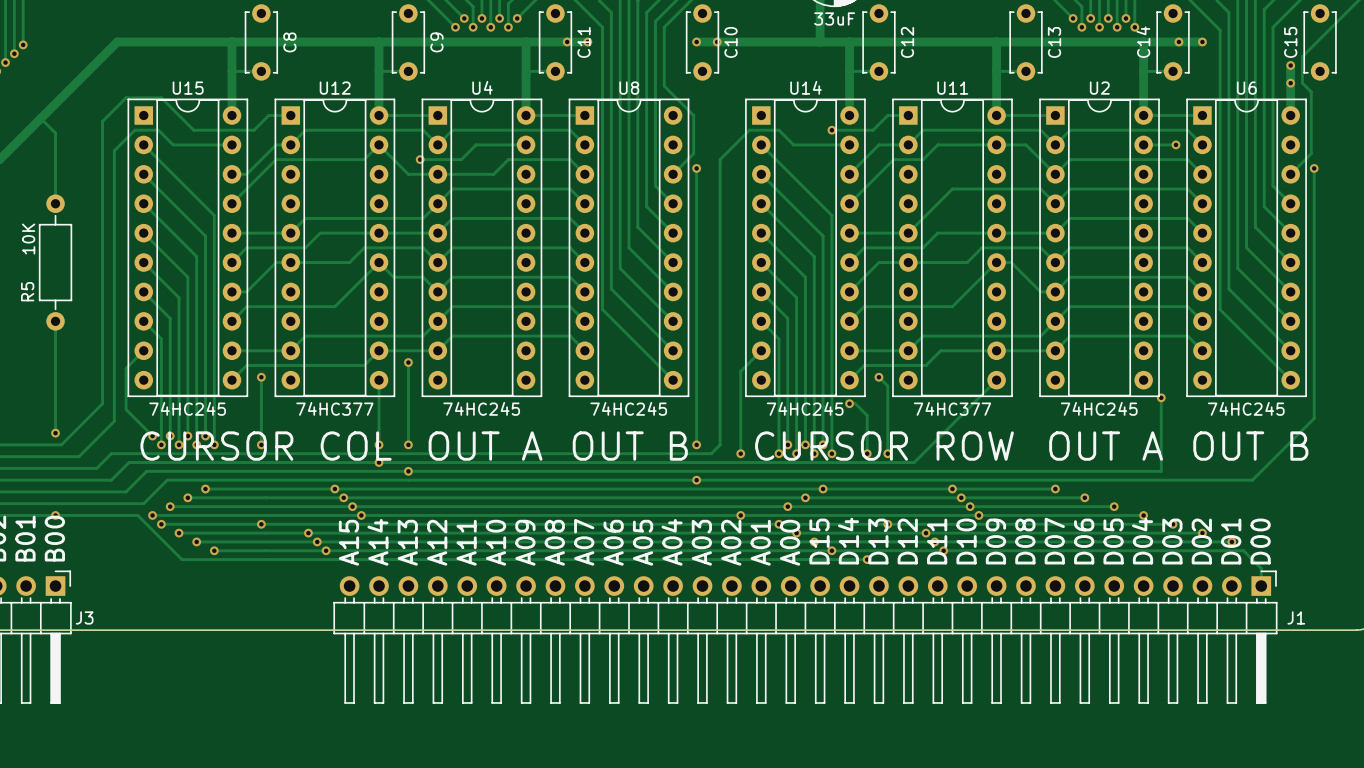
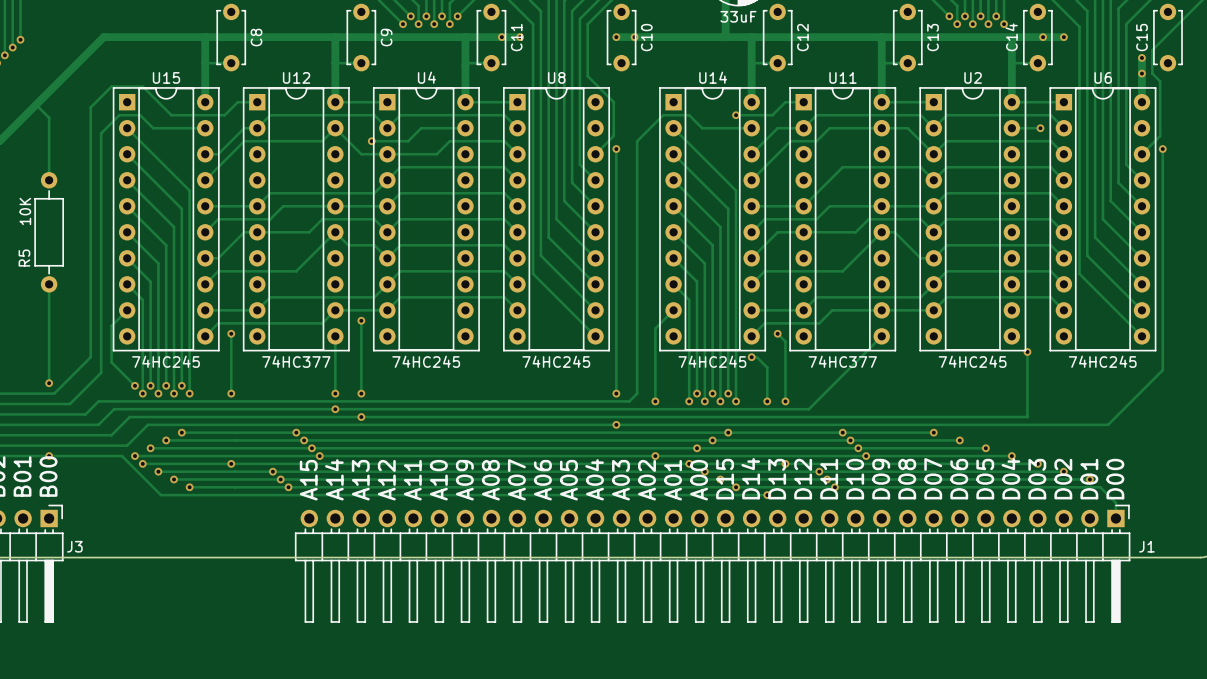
text: CURSOR COL (266, 446) -> none
text: OUT A (485, 446) -> none
text: OUT B (630, 446) -> none
text: CURSOR ROW (884, 446) -> none
text: OUT A (1106, 446) -> none
text: OUT B (1250, 446) -> none

